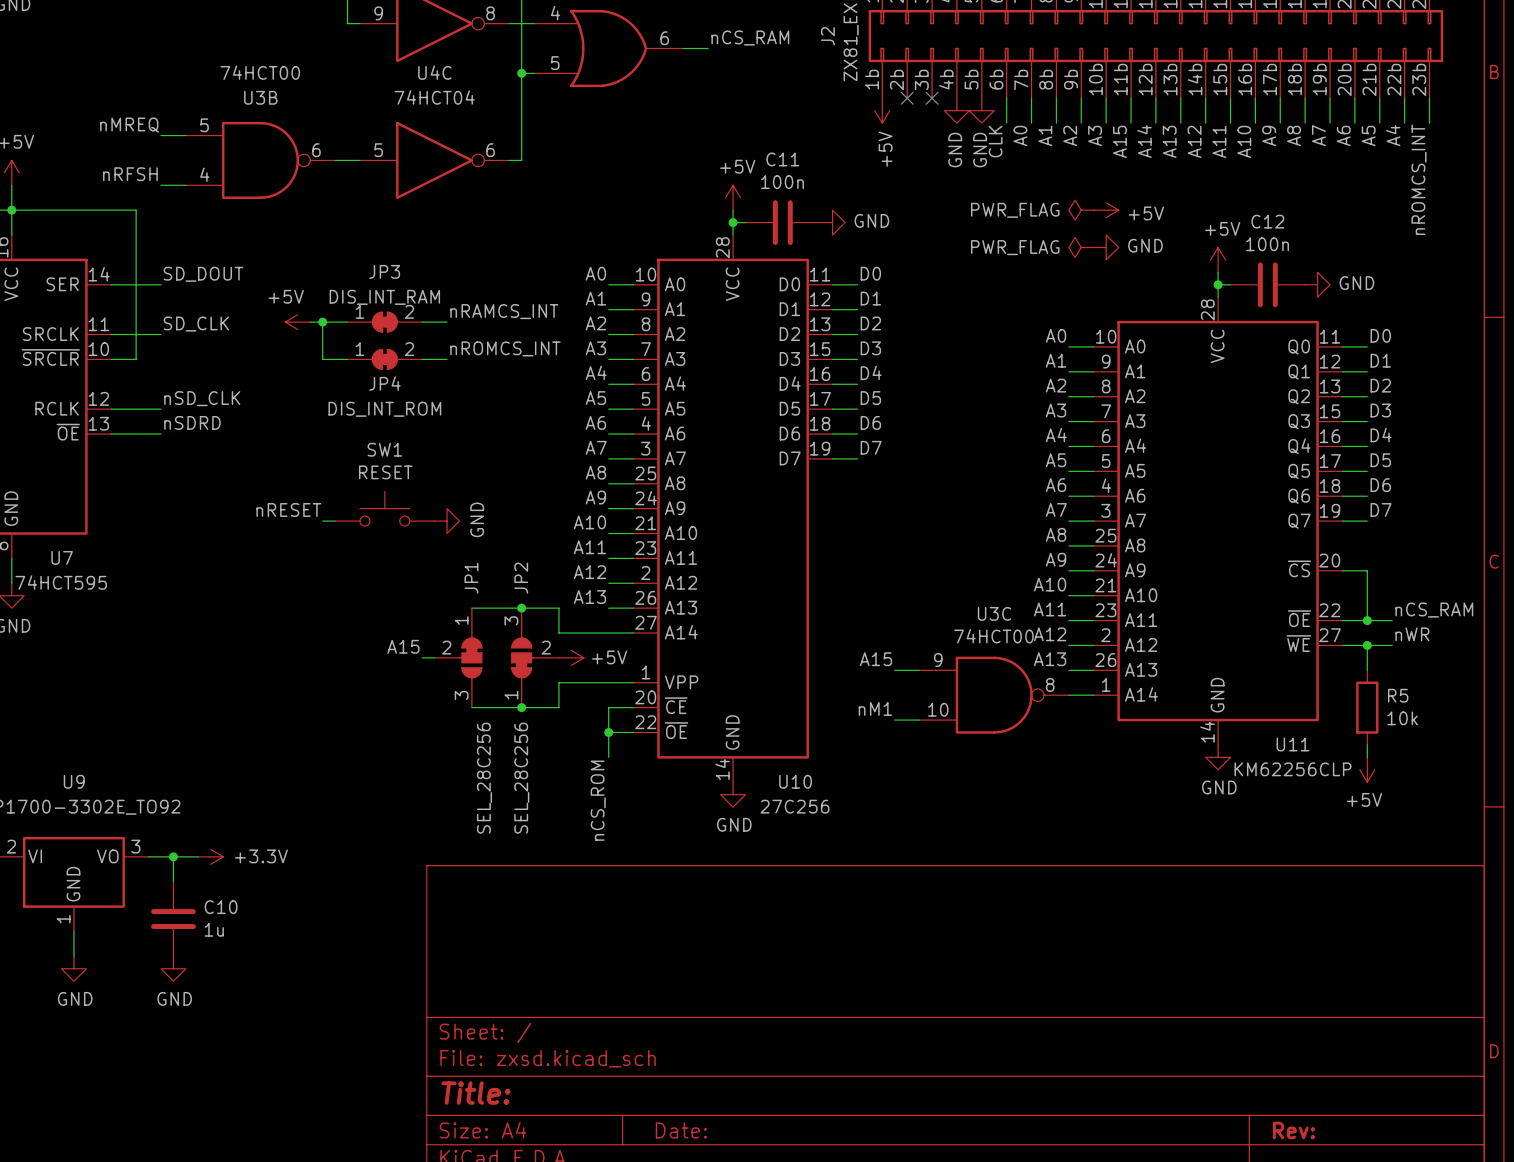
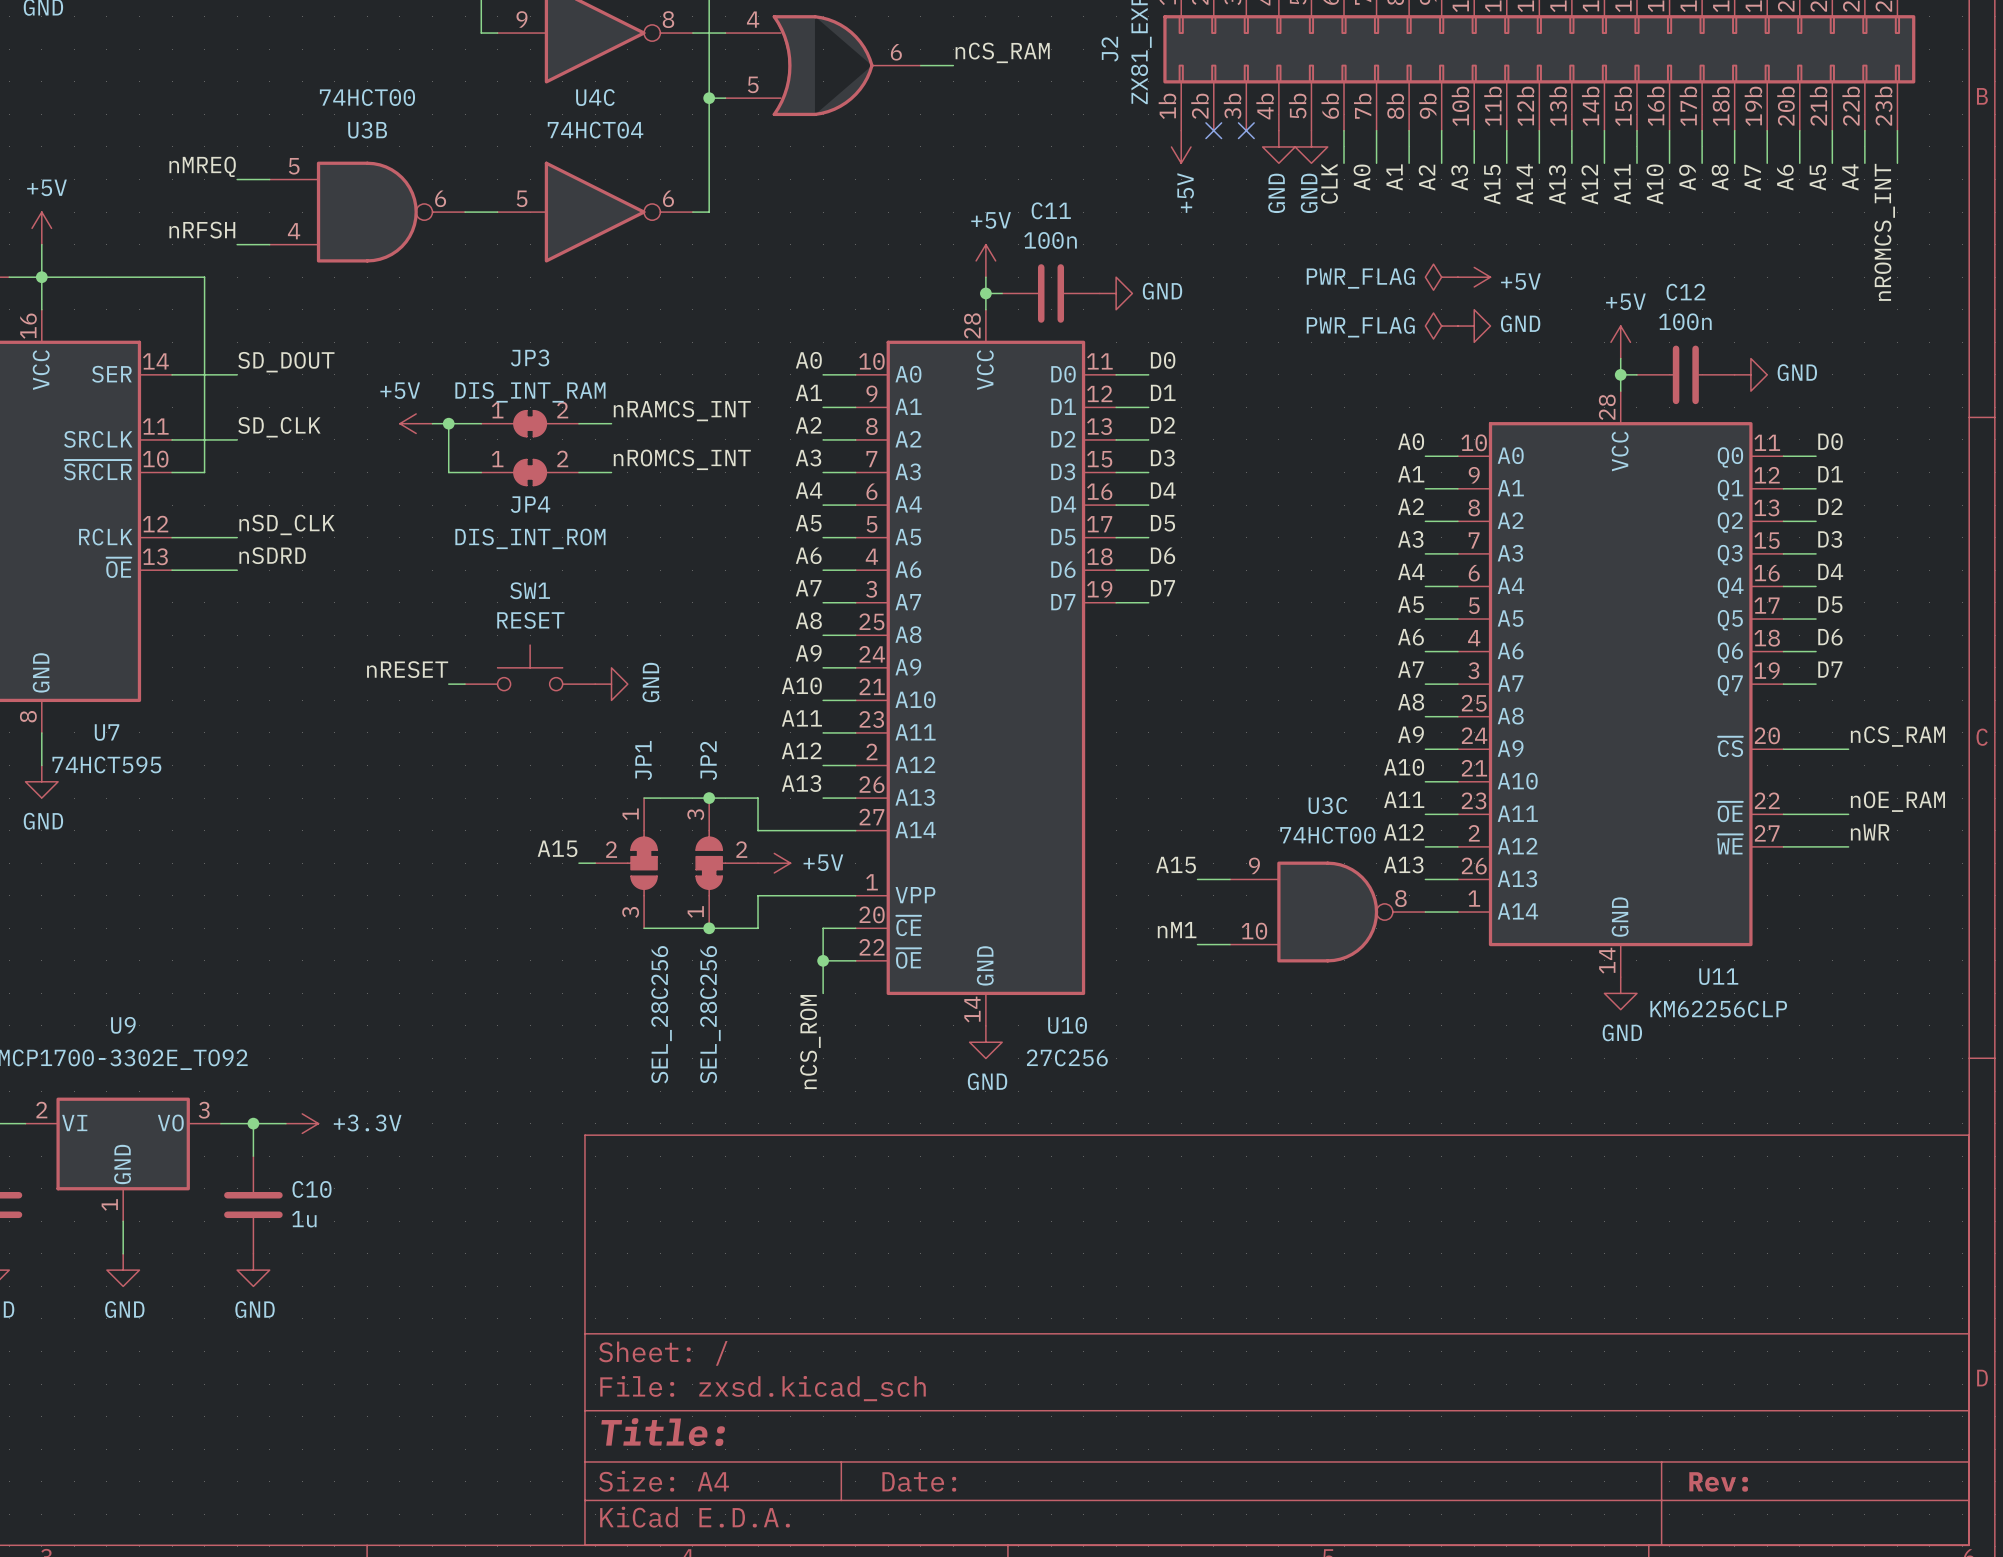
label: none -> nCS_RAM (1897, 736)
wire: (1367, 570) (1367, 620) -> (1816, 749) (1848, 749)
label: nCS_RAM (1434, 610) -> nOE_RAM (1897, 801)
junction: (1367, 620) -> none
wire: (1367, 645) (1367, 670) -> none
junction: (1367, 645) -> none
R5: 10k (1367, 707) -> none
wire: (1367, 744) (1367, 757) -> none
power symbol: +5V (1367, 769) -> none

